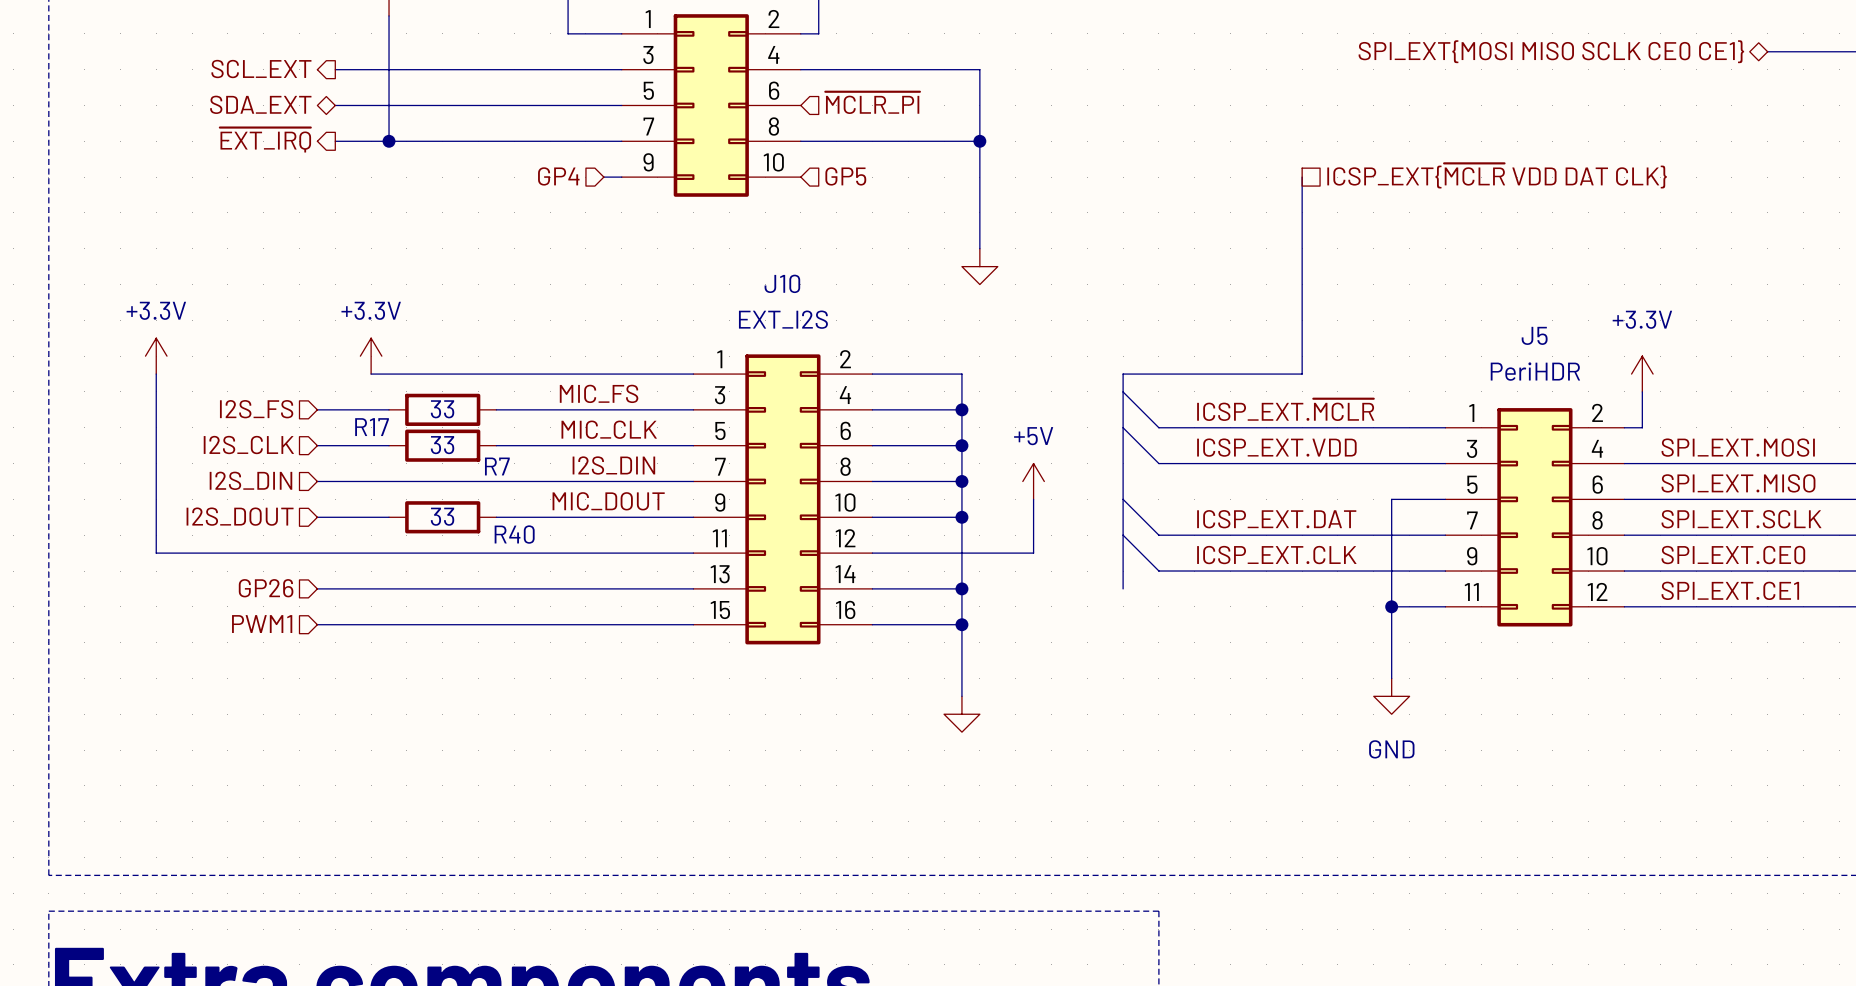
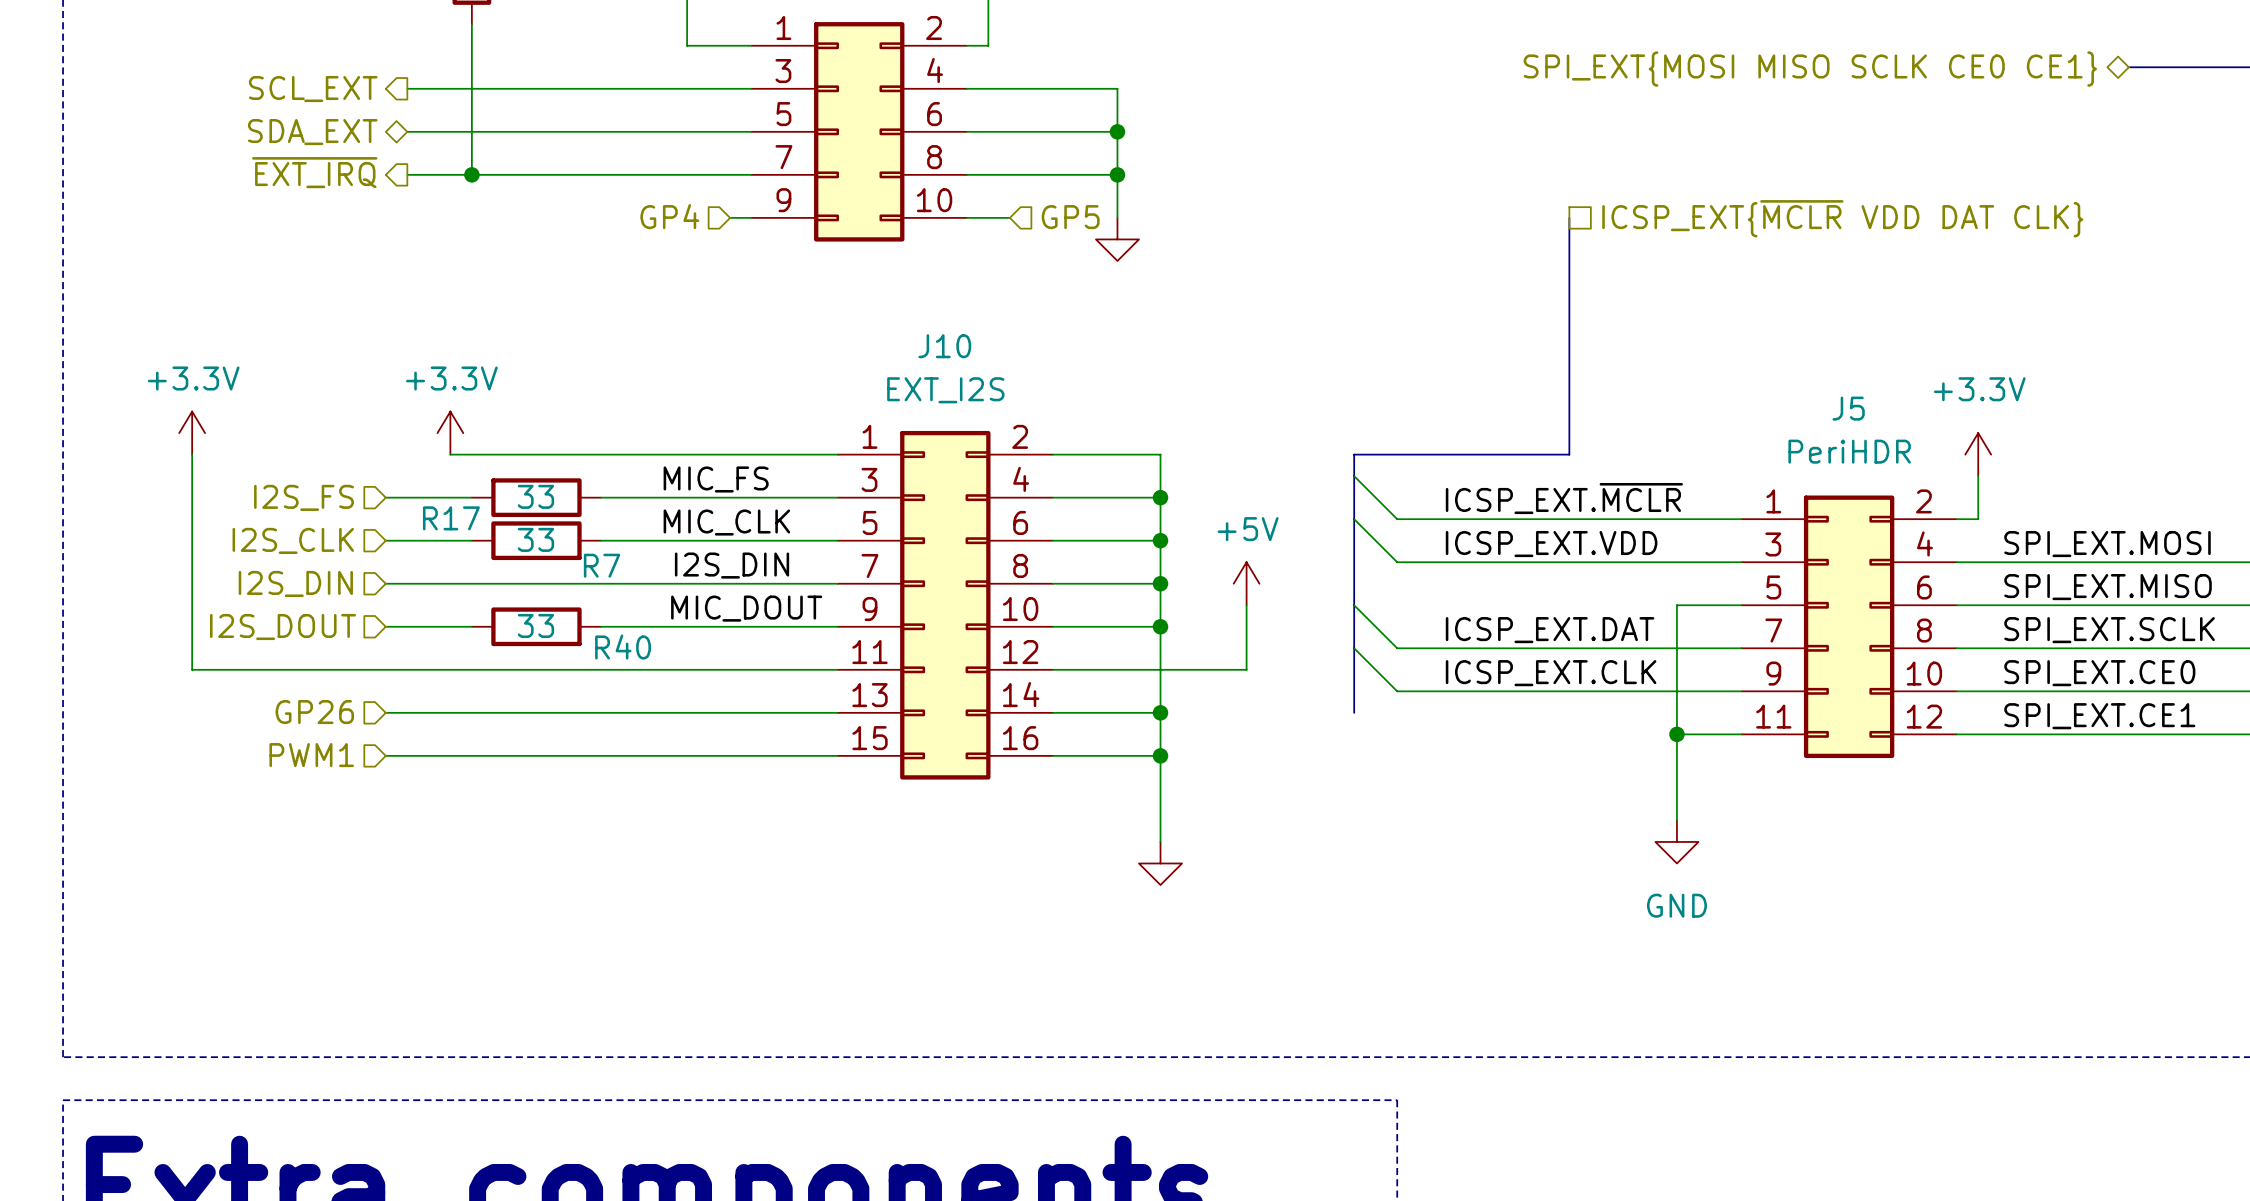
wire: (926, 69) (979, 69) (979, 248) -> (1117, 88) (1117, 217)
hierarchical label: ~{MCLR_PI} (872, 102) -> none
wire: none -> (966, 131) (1117, 131)
junction: none -> (1117, 131)
wire: (926, 141) (979, 141) -> none
junction: none -> (1117, 174)
junction: (979, 141) -> none
hierarchical label position: GP5 (845, 176) -> GP5 (1070, 217)
wire: none -> (966, 217) (1009, 217)
power symbol position: (979, 266) -> (1117, 239)

